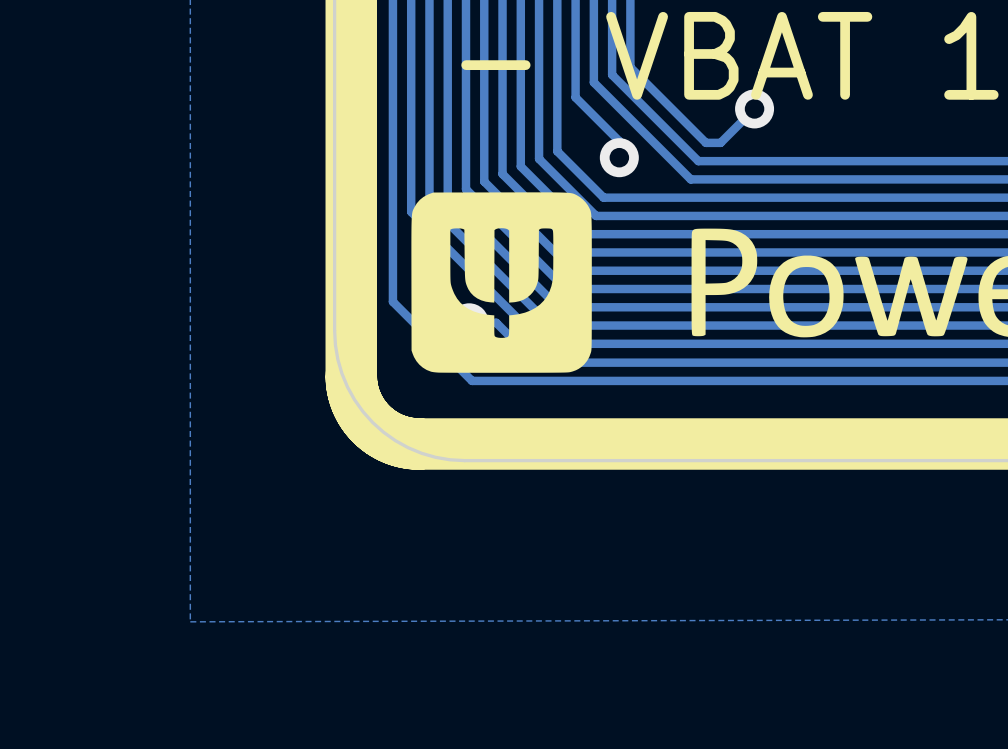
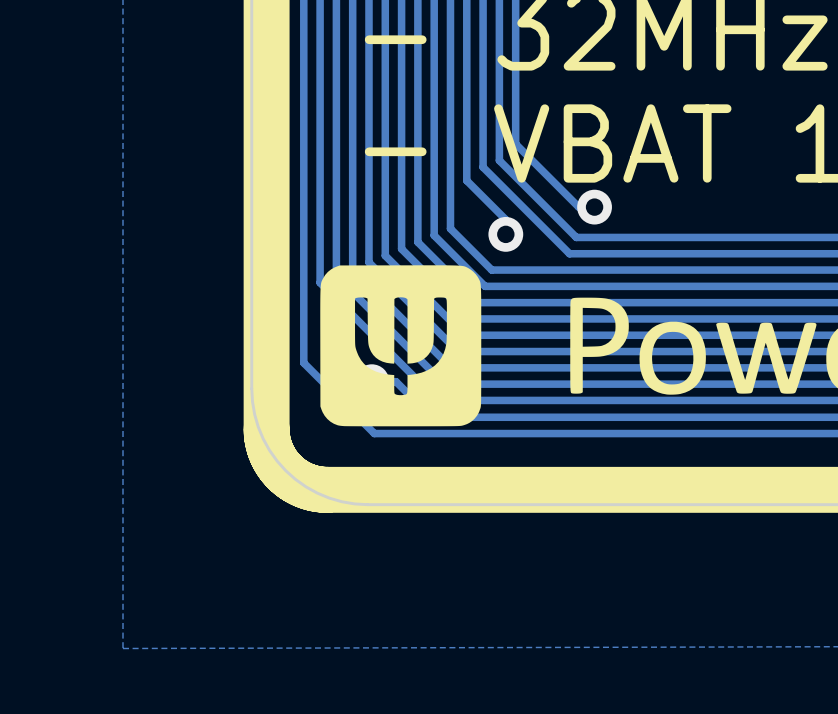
track: (630, 56) (630, 67) (705, 142) (720, 142) (754, 108) -> (515, 144) (578, 207) (594, 207)
via position: (754, 108) -> (594, 207)

